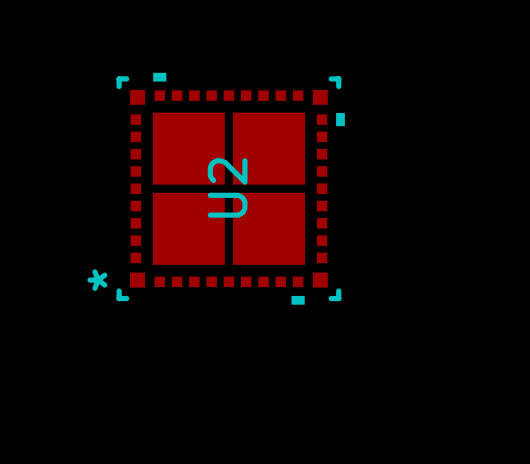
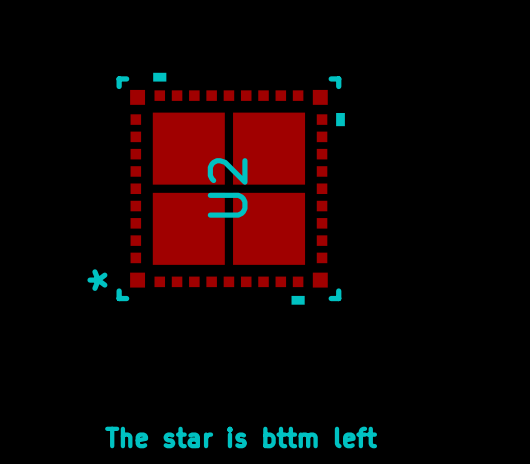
text: none -> The star is bttm left (241, 437)

